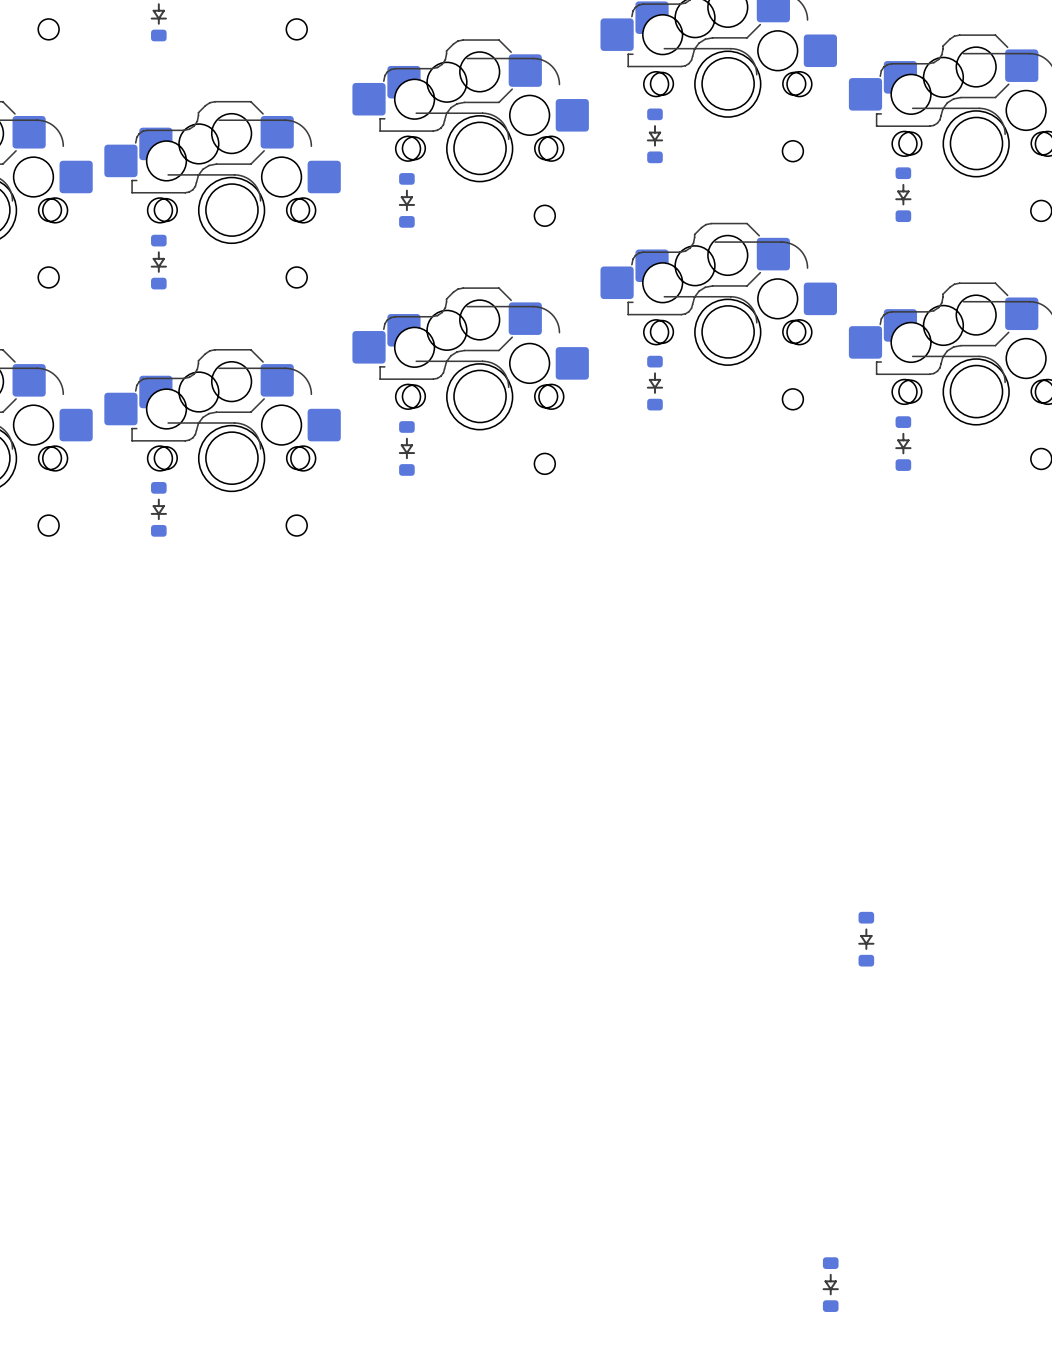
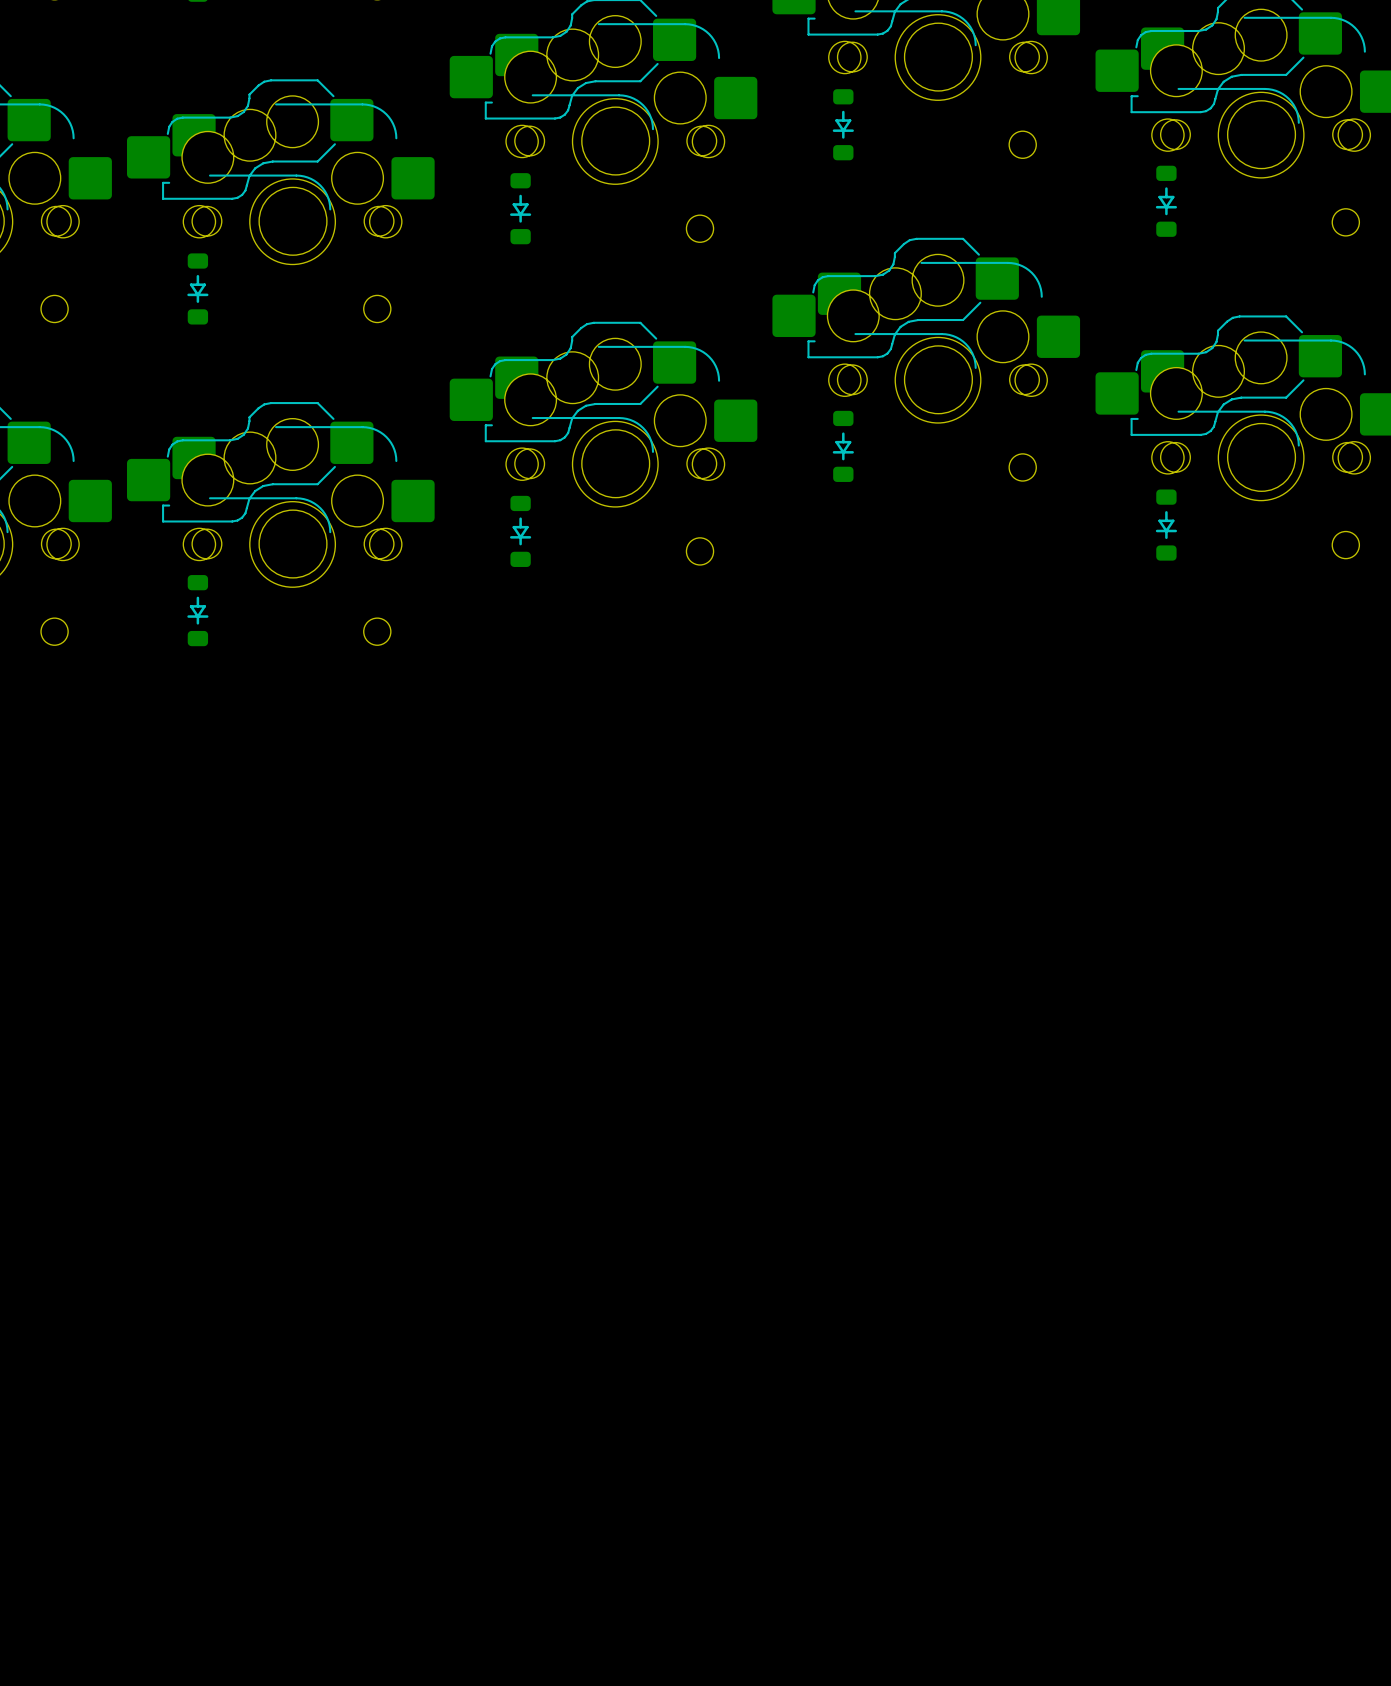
part: (866, 939) -> none
part: (830, 1284) -> none

